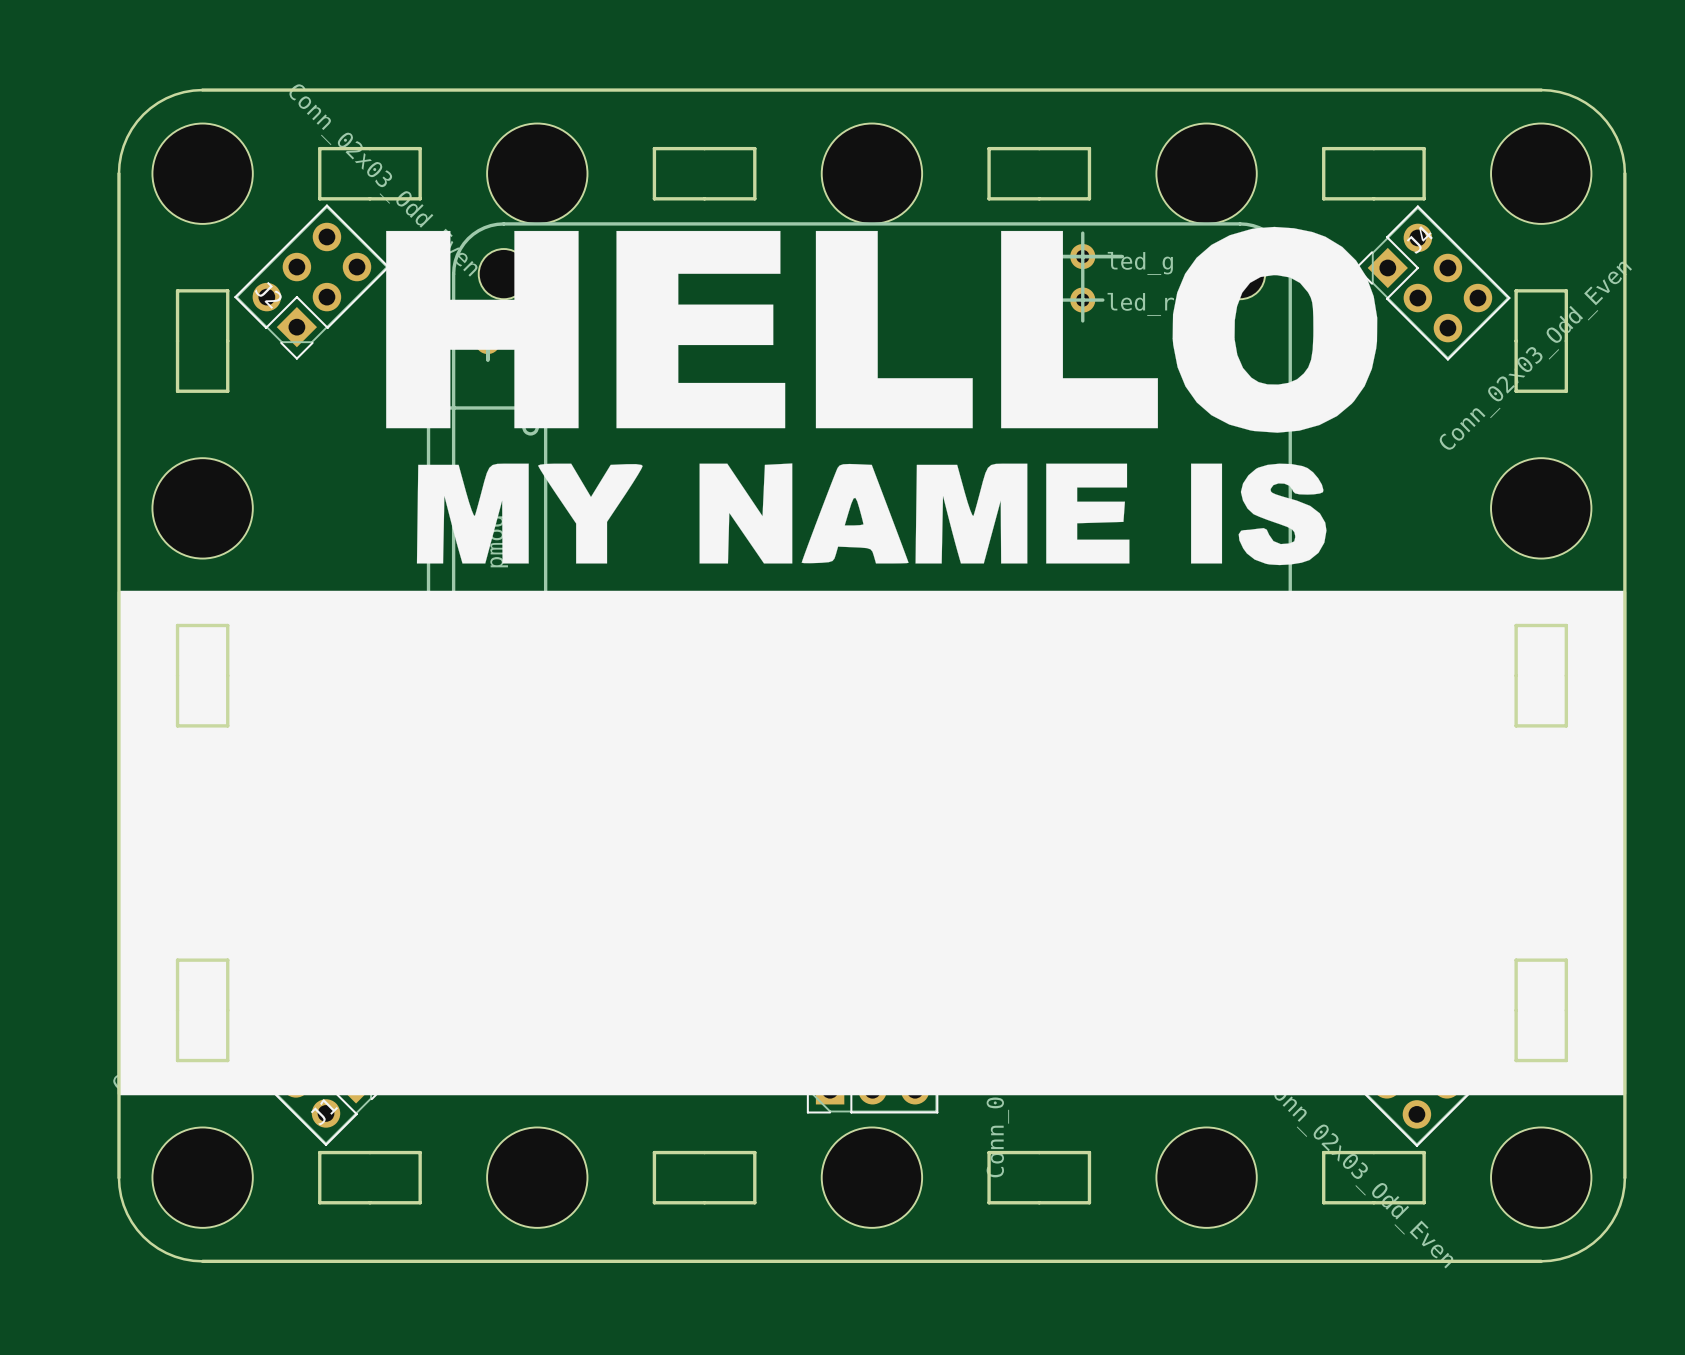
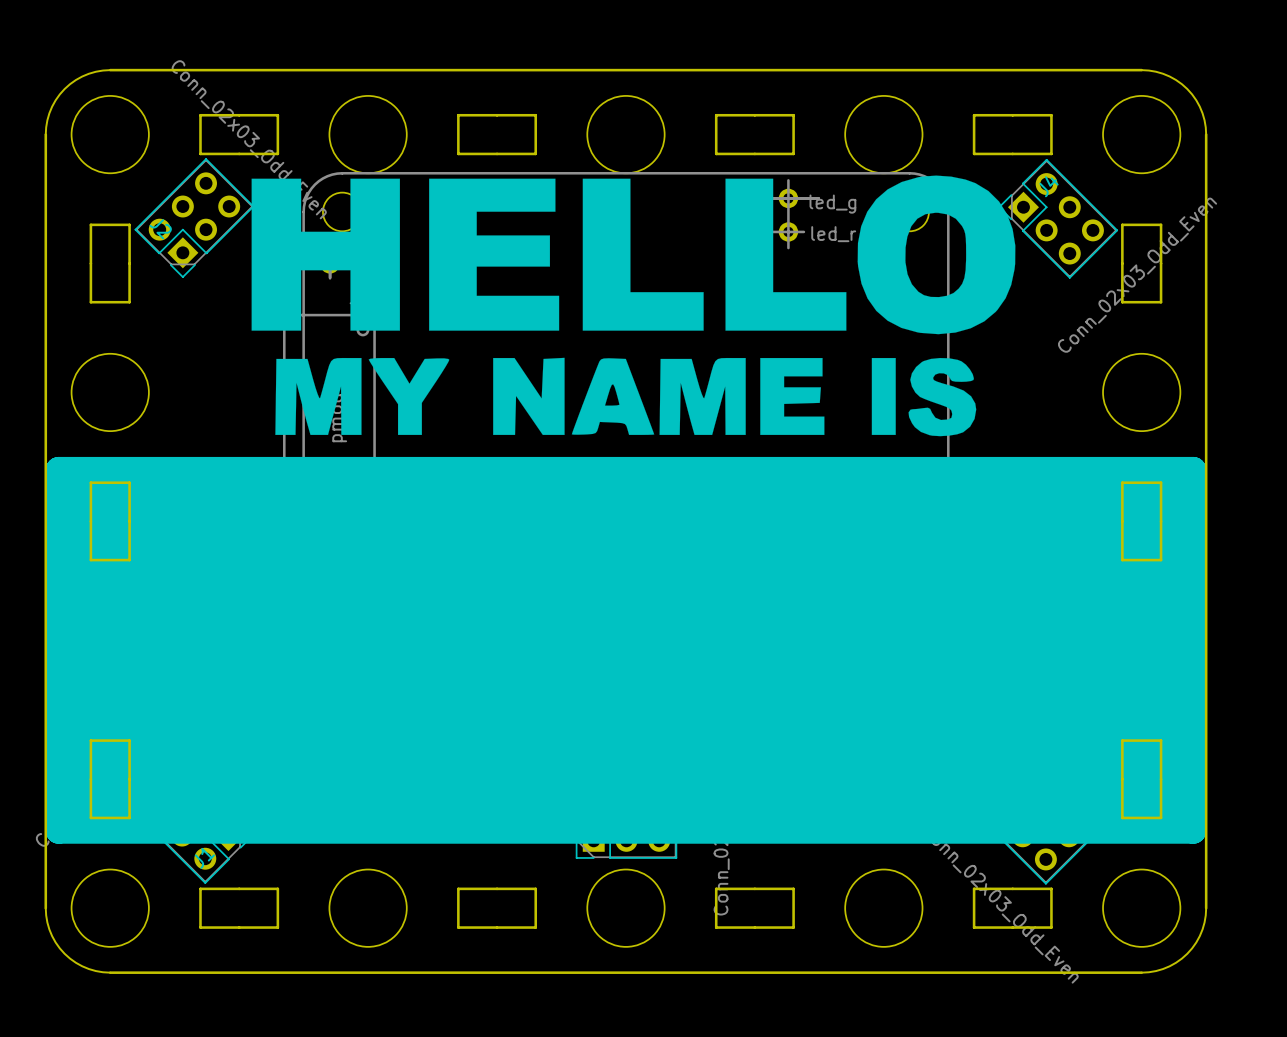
drawing: [117, 590, 1627, 1096] -> none
line: none -> (58, 469) (58, 830) (1193, 830) (1193, 469) (58, 469)

